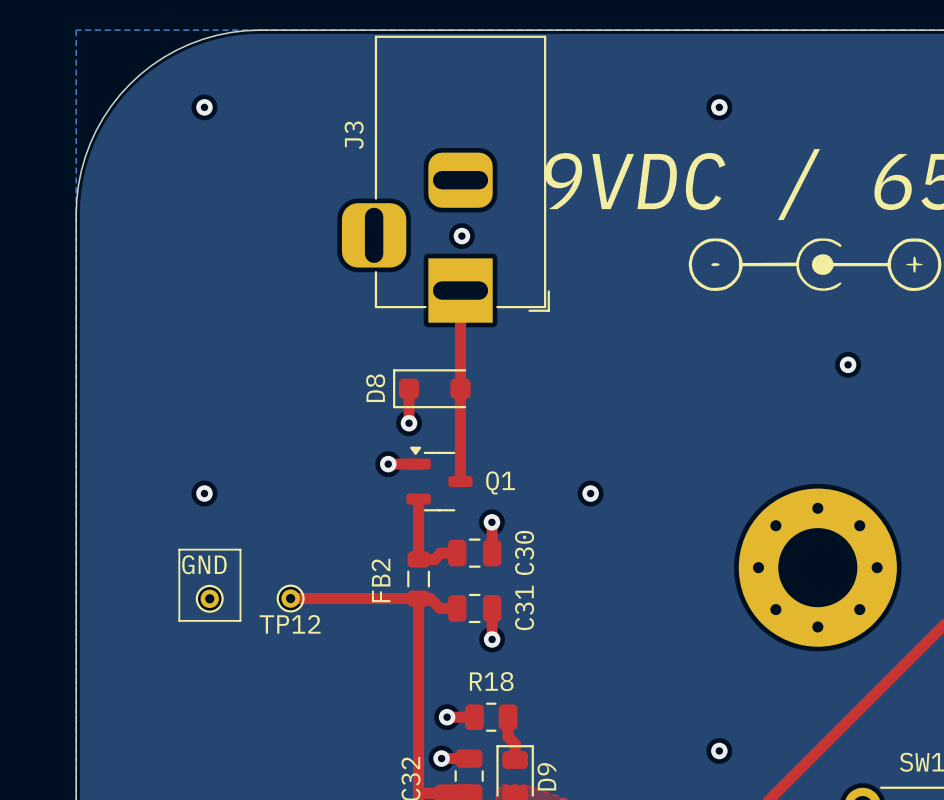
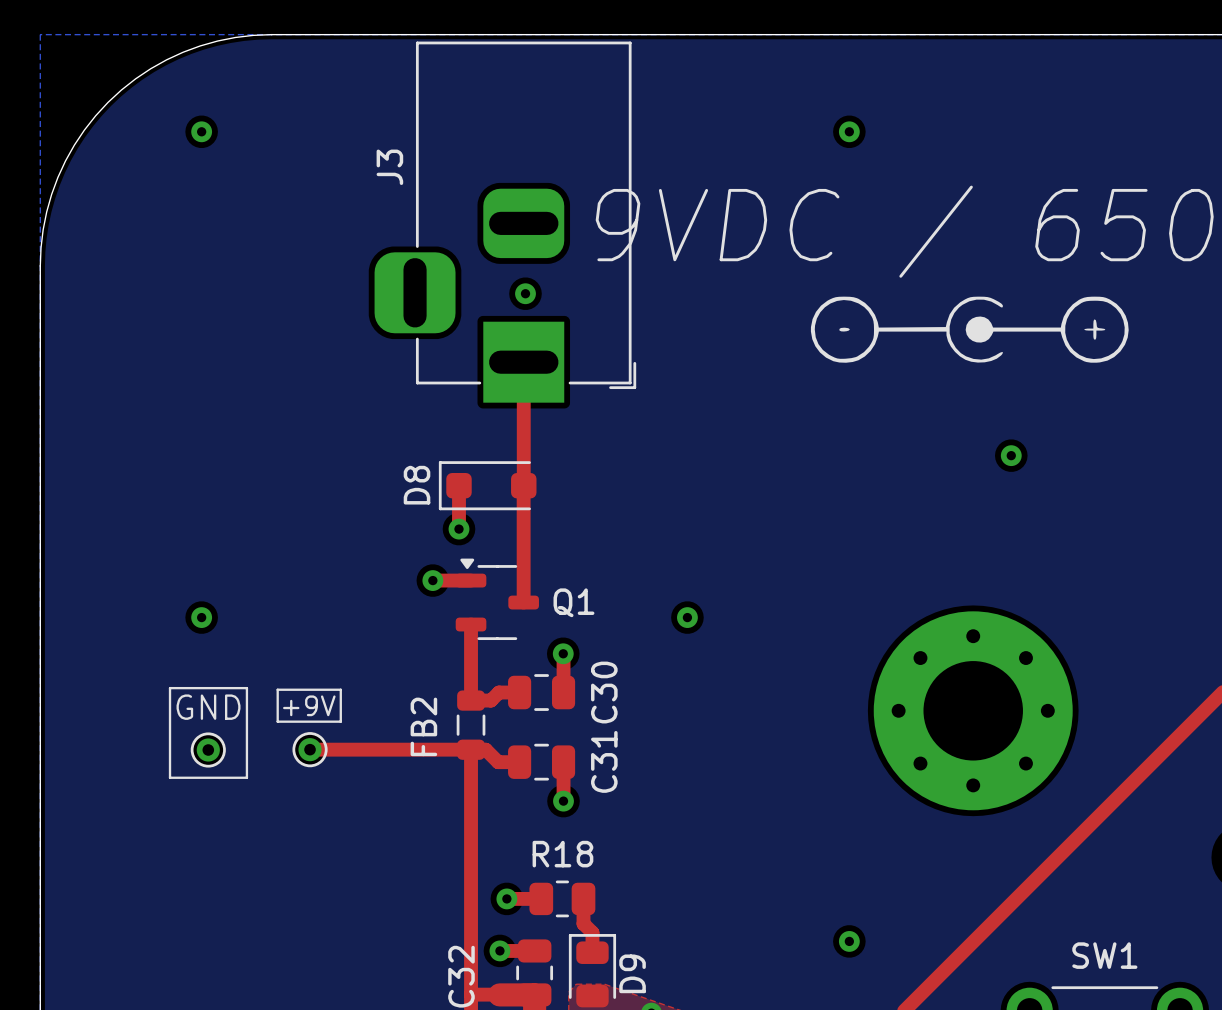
line: none -> (277, 689) (340, 689) (340, 721) (277, 721) (277, 689)
text: none -> +9V (309, 705)
TP12 name: TP12 (290, 624) -> none

